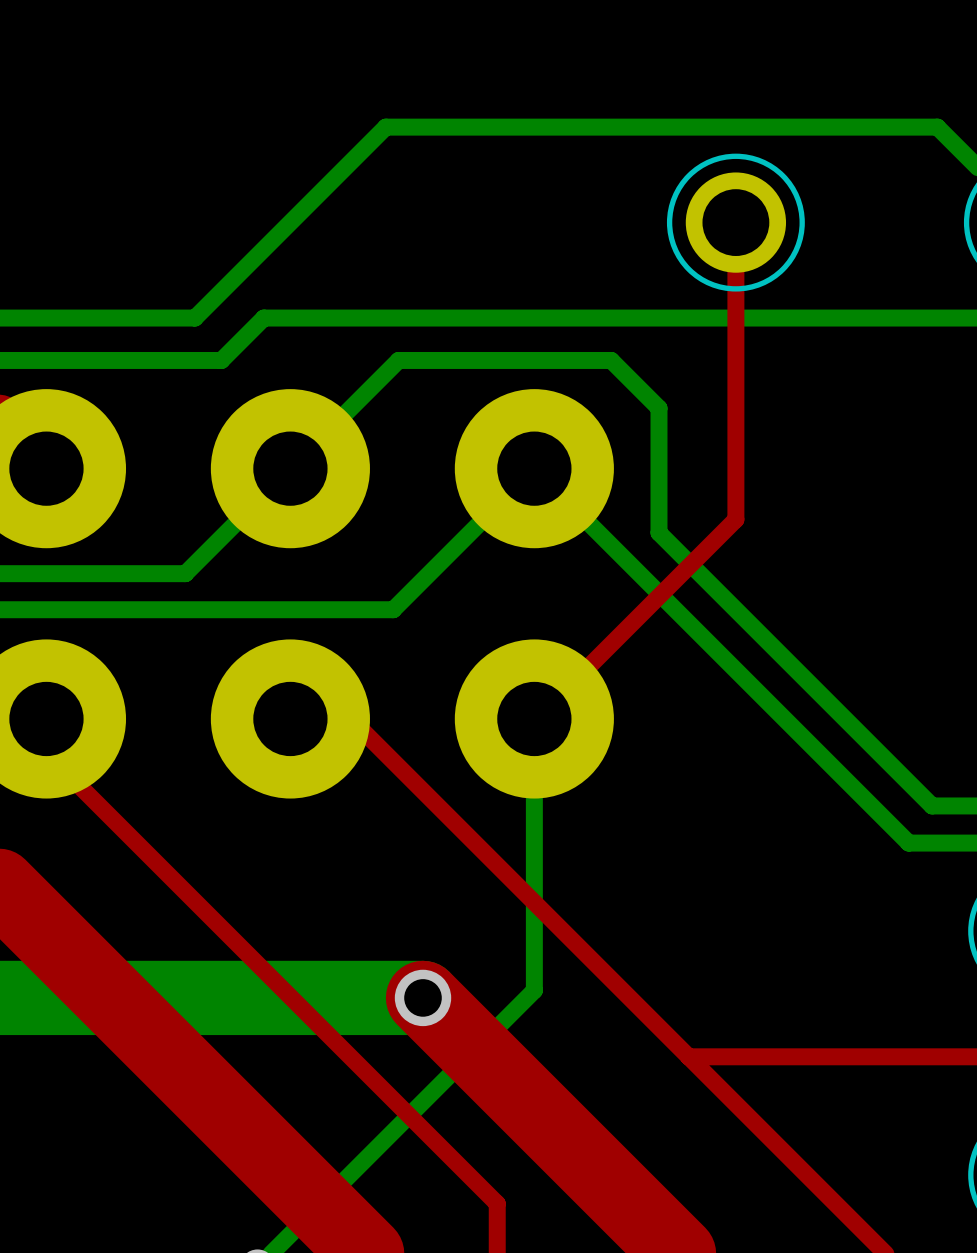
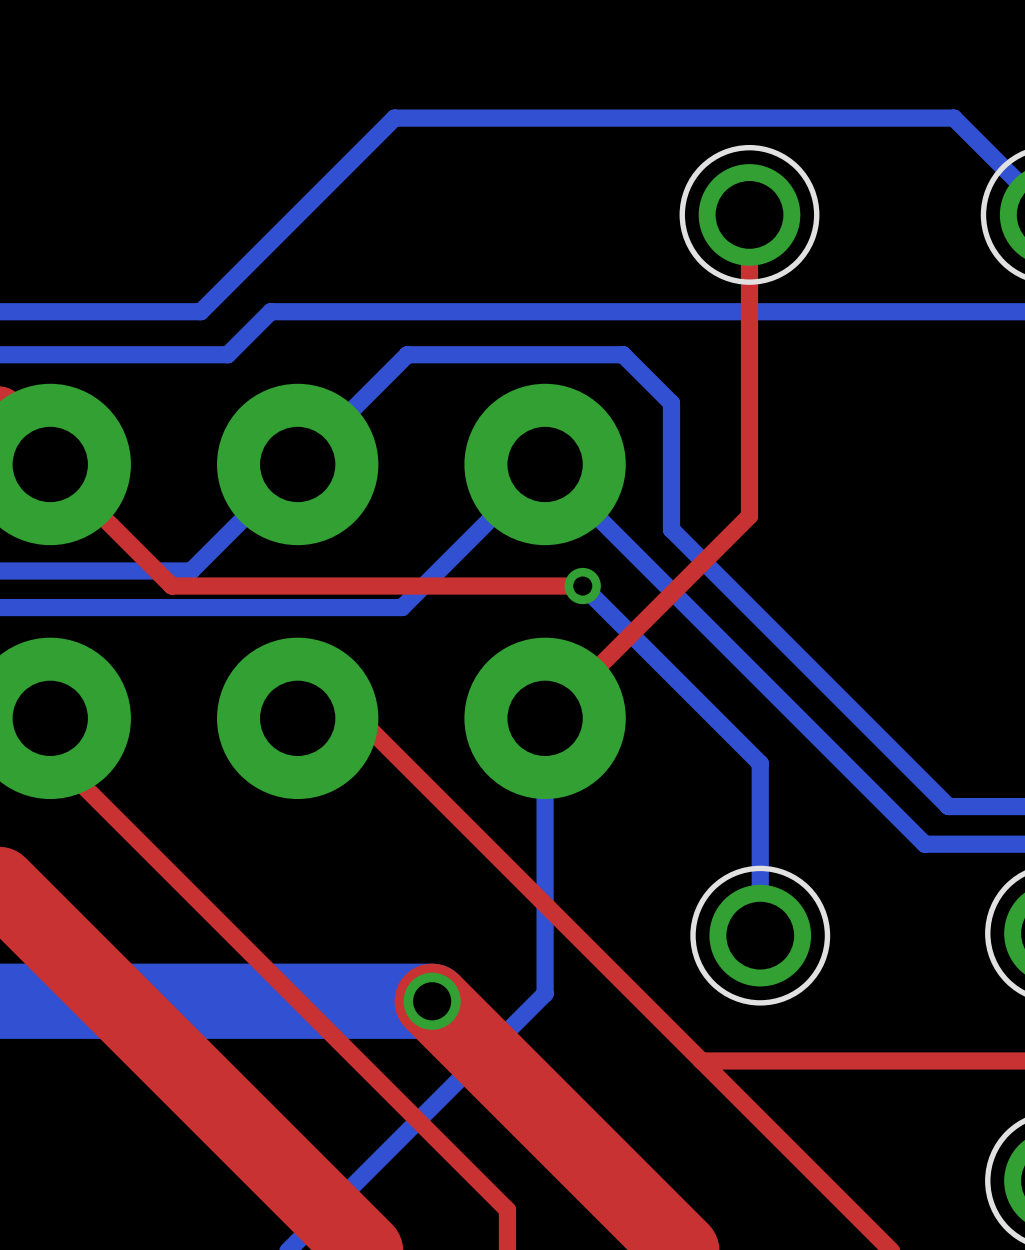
top track: none -> (50, 464) (171, 586) (582, 586)
bottom track: none -> (582, 586) (760, 763) (760, 935)
via: none -> (582, 586)
part: none -> (760, 935)

